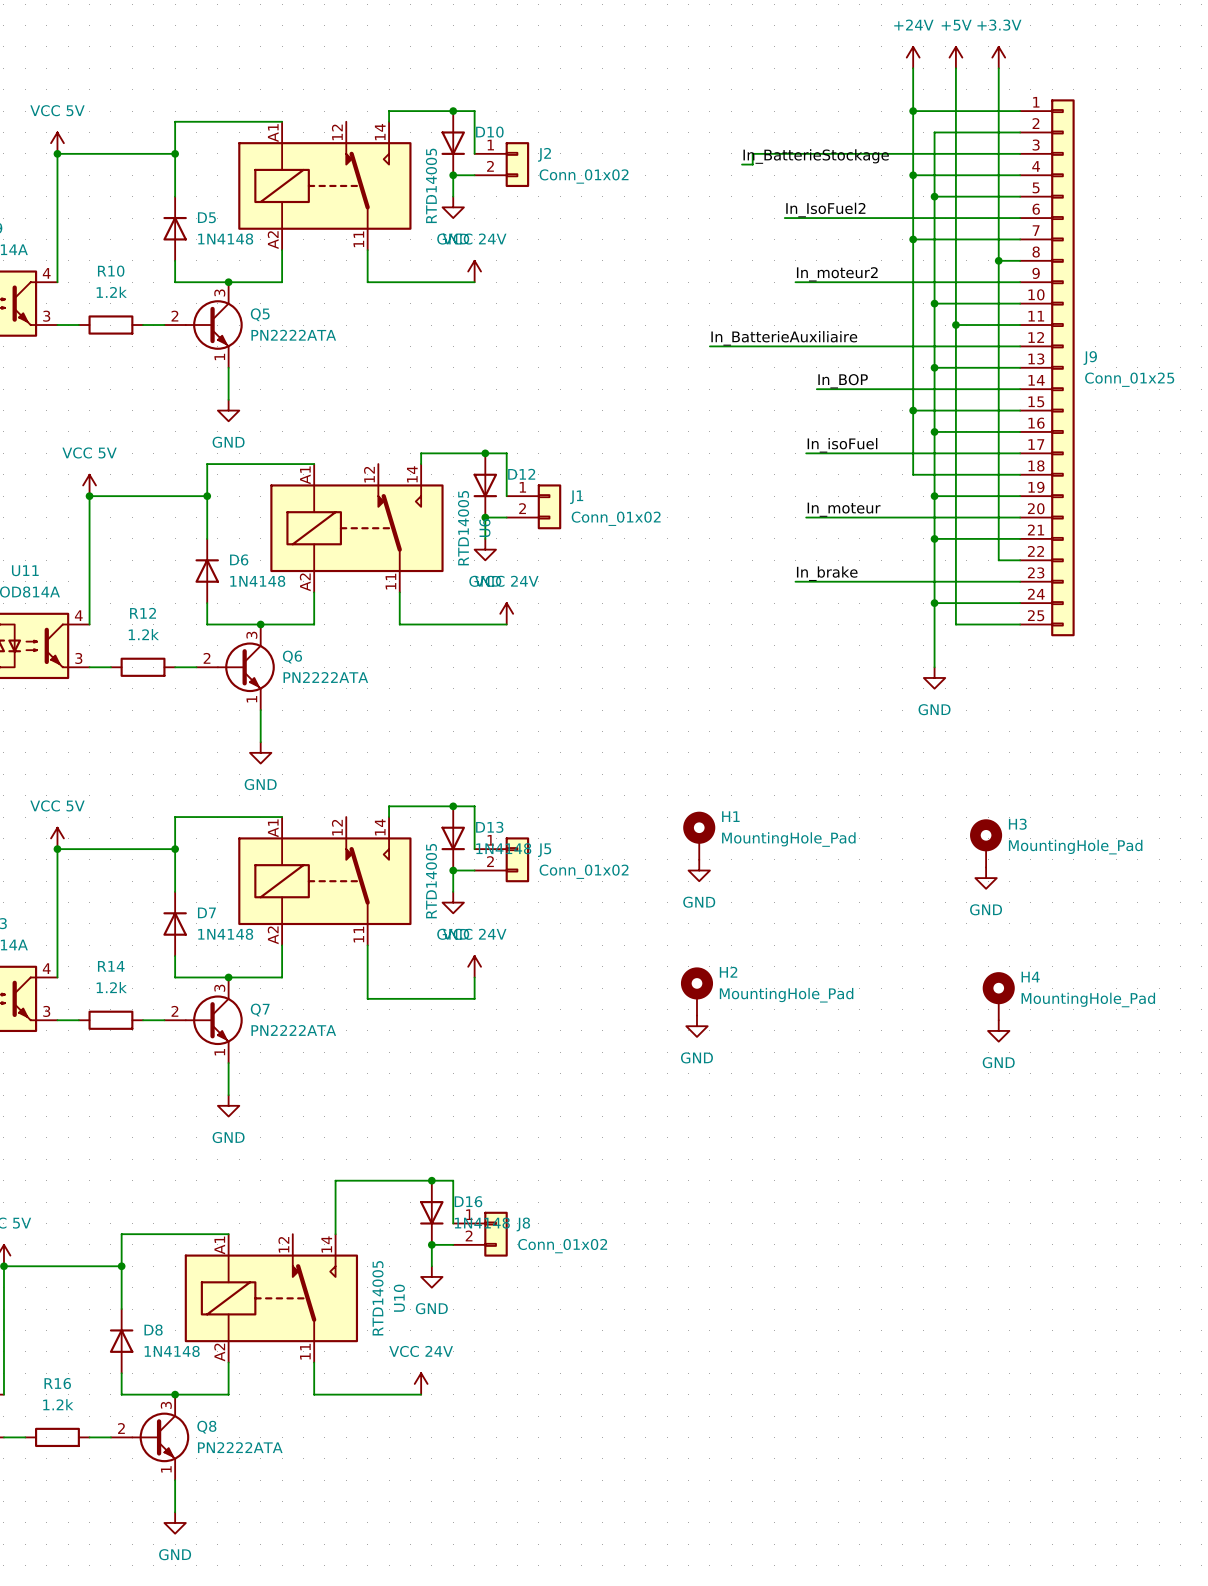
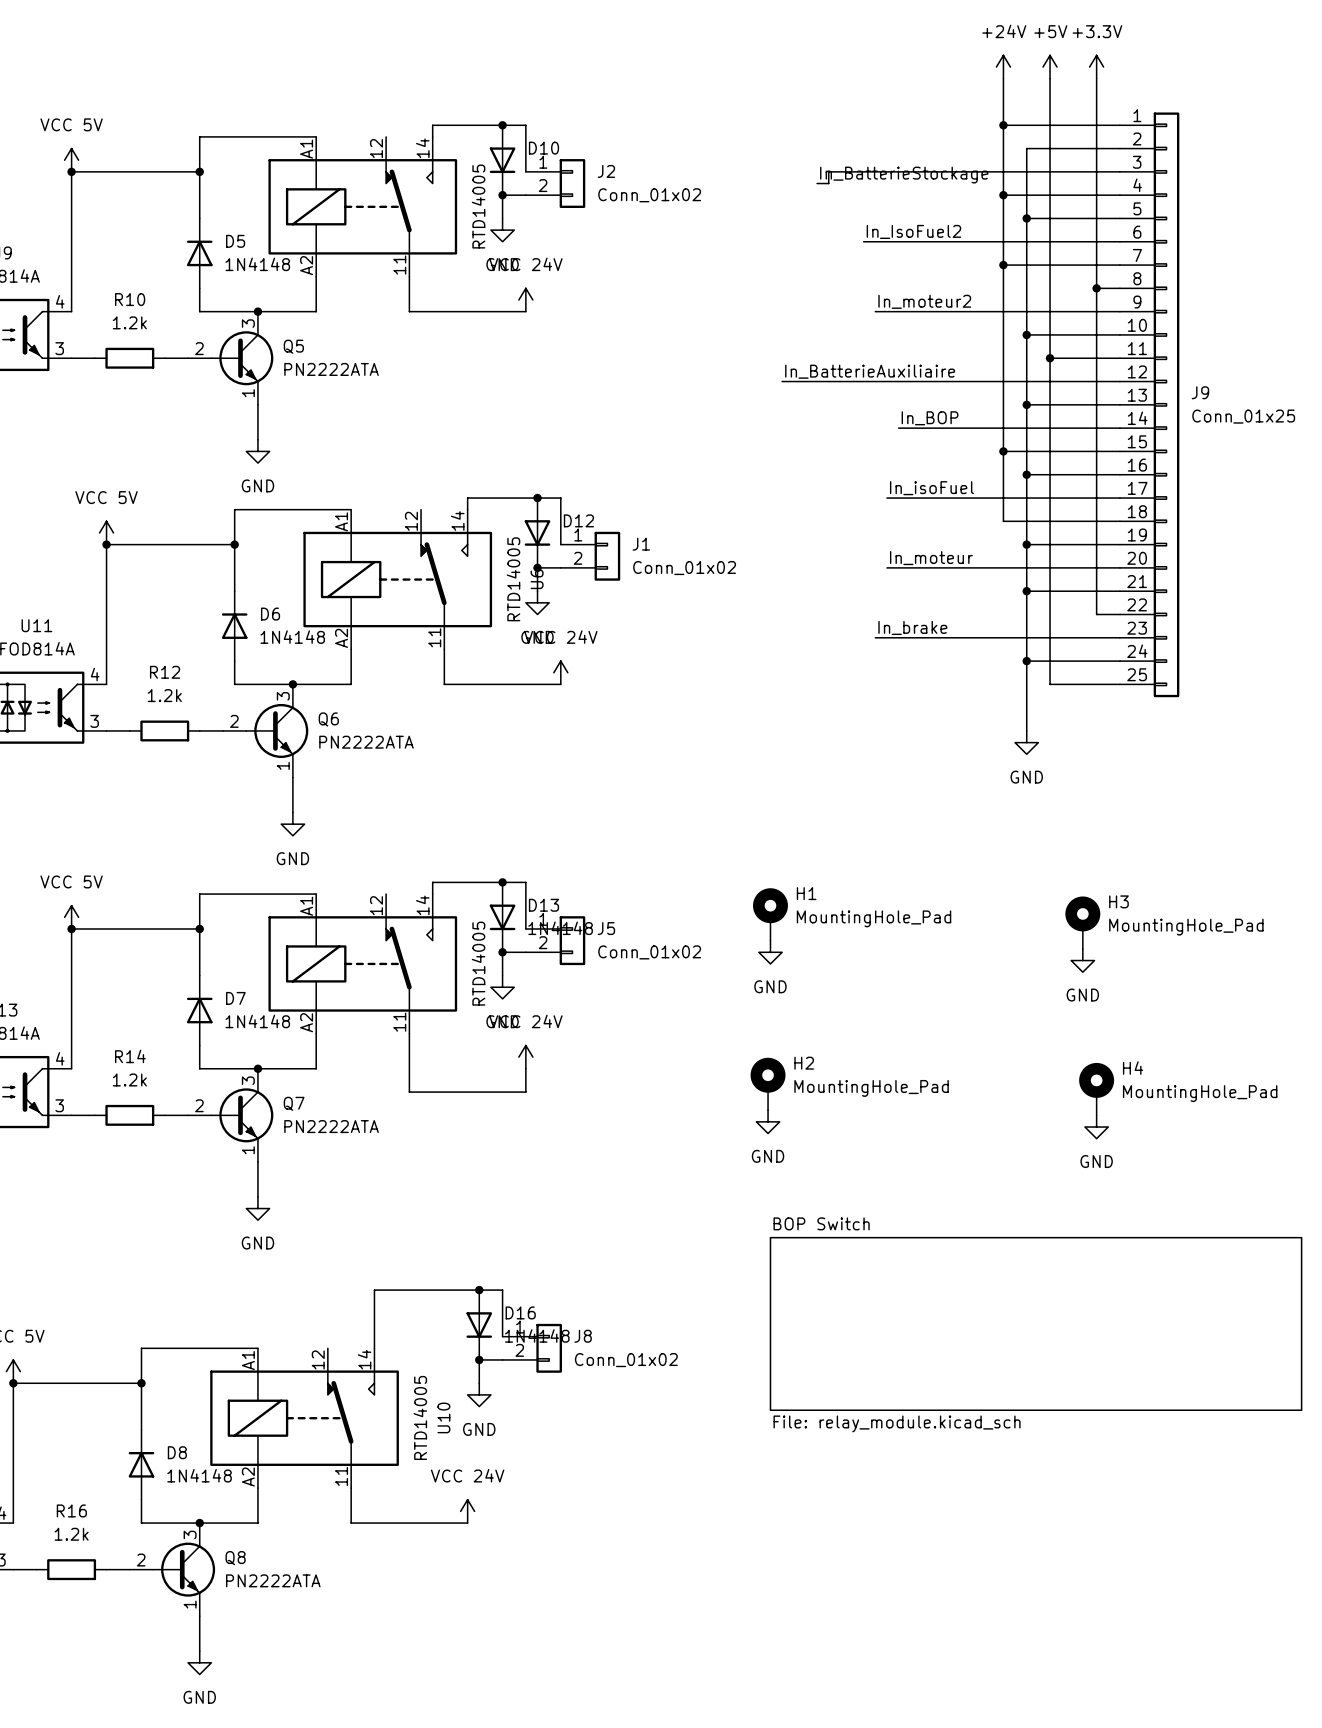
sheet BOP Switch: none -> File: relay_module.kicad_sch (1036, 1323)

